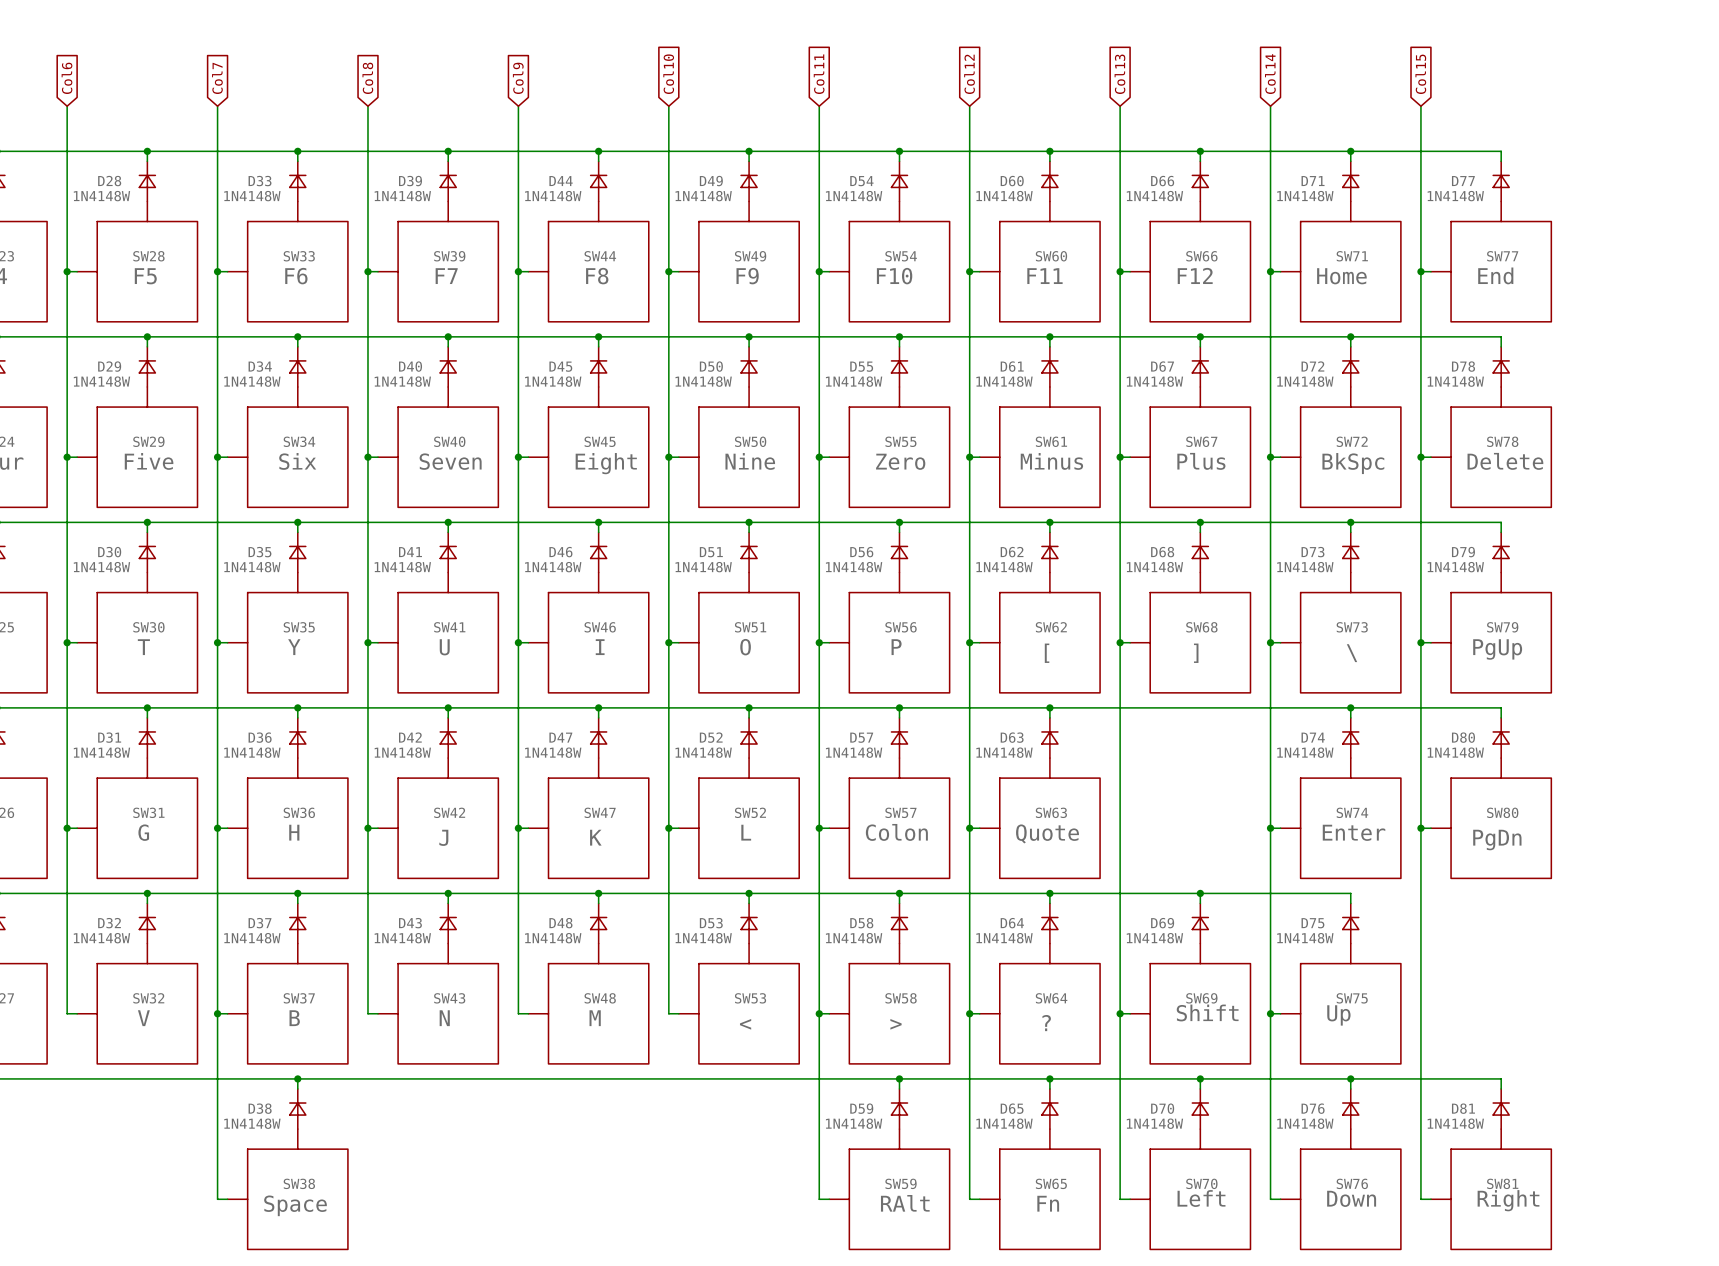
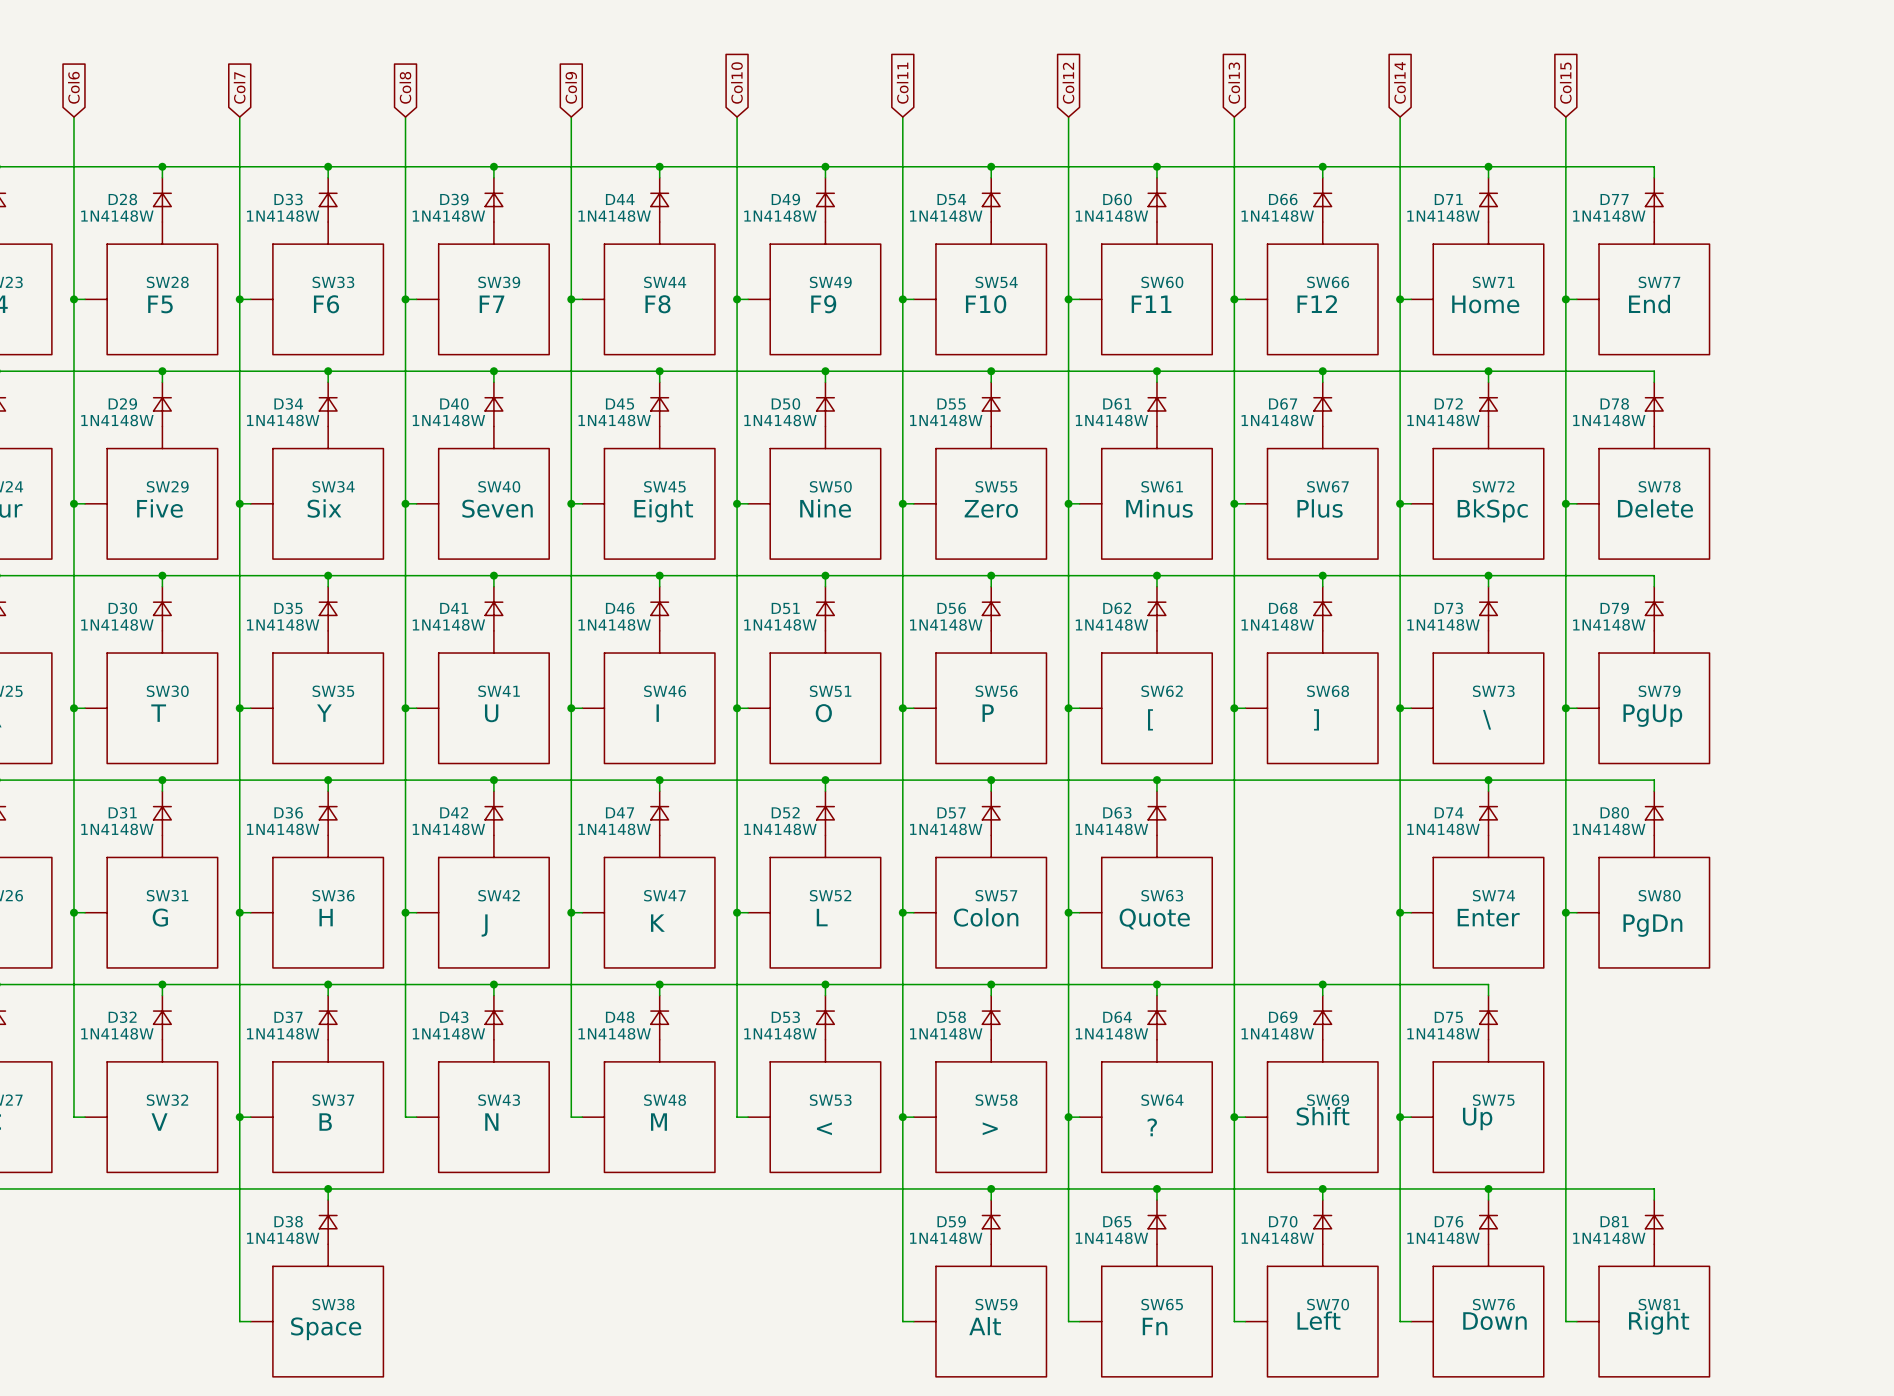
SW59 value: RAlt (905, 1203) -> Alt (985, 1326)

